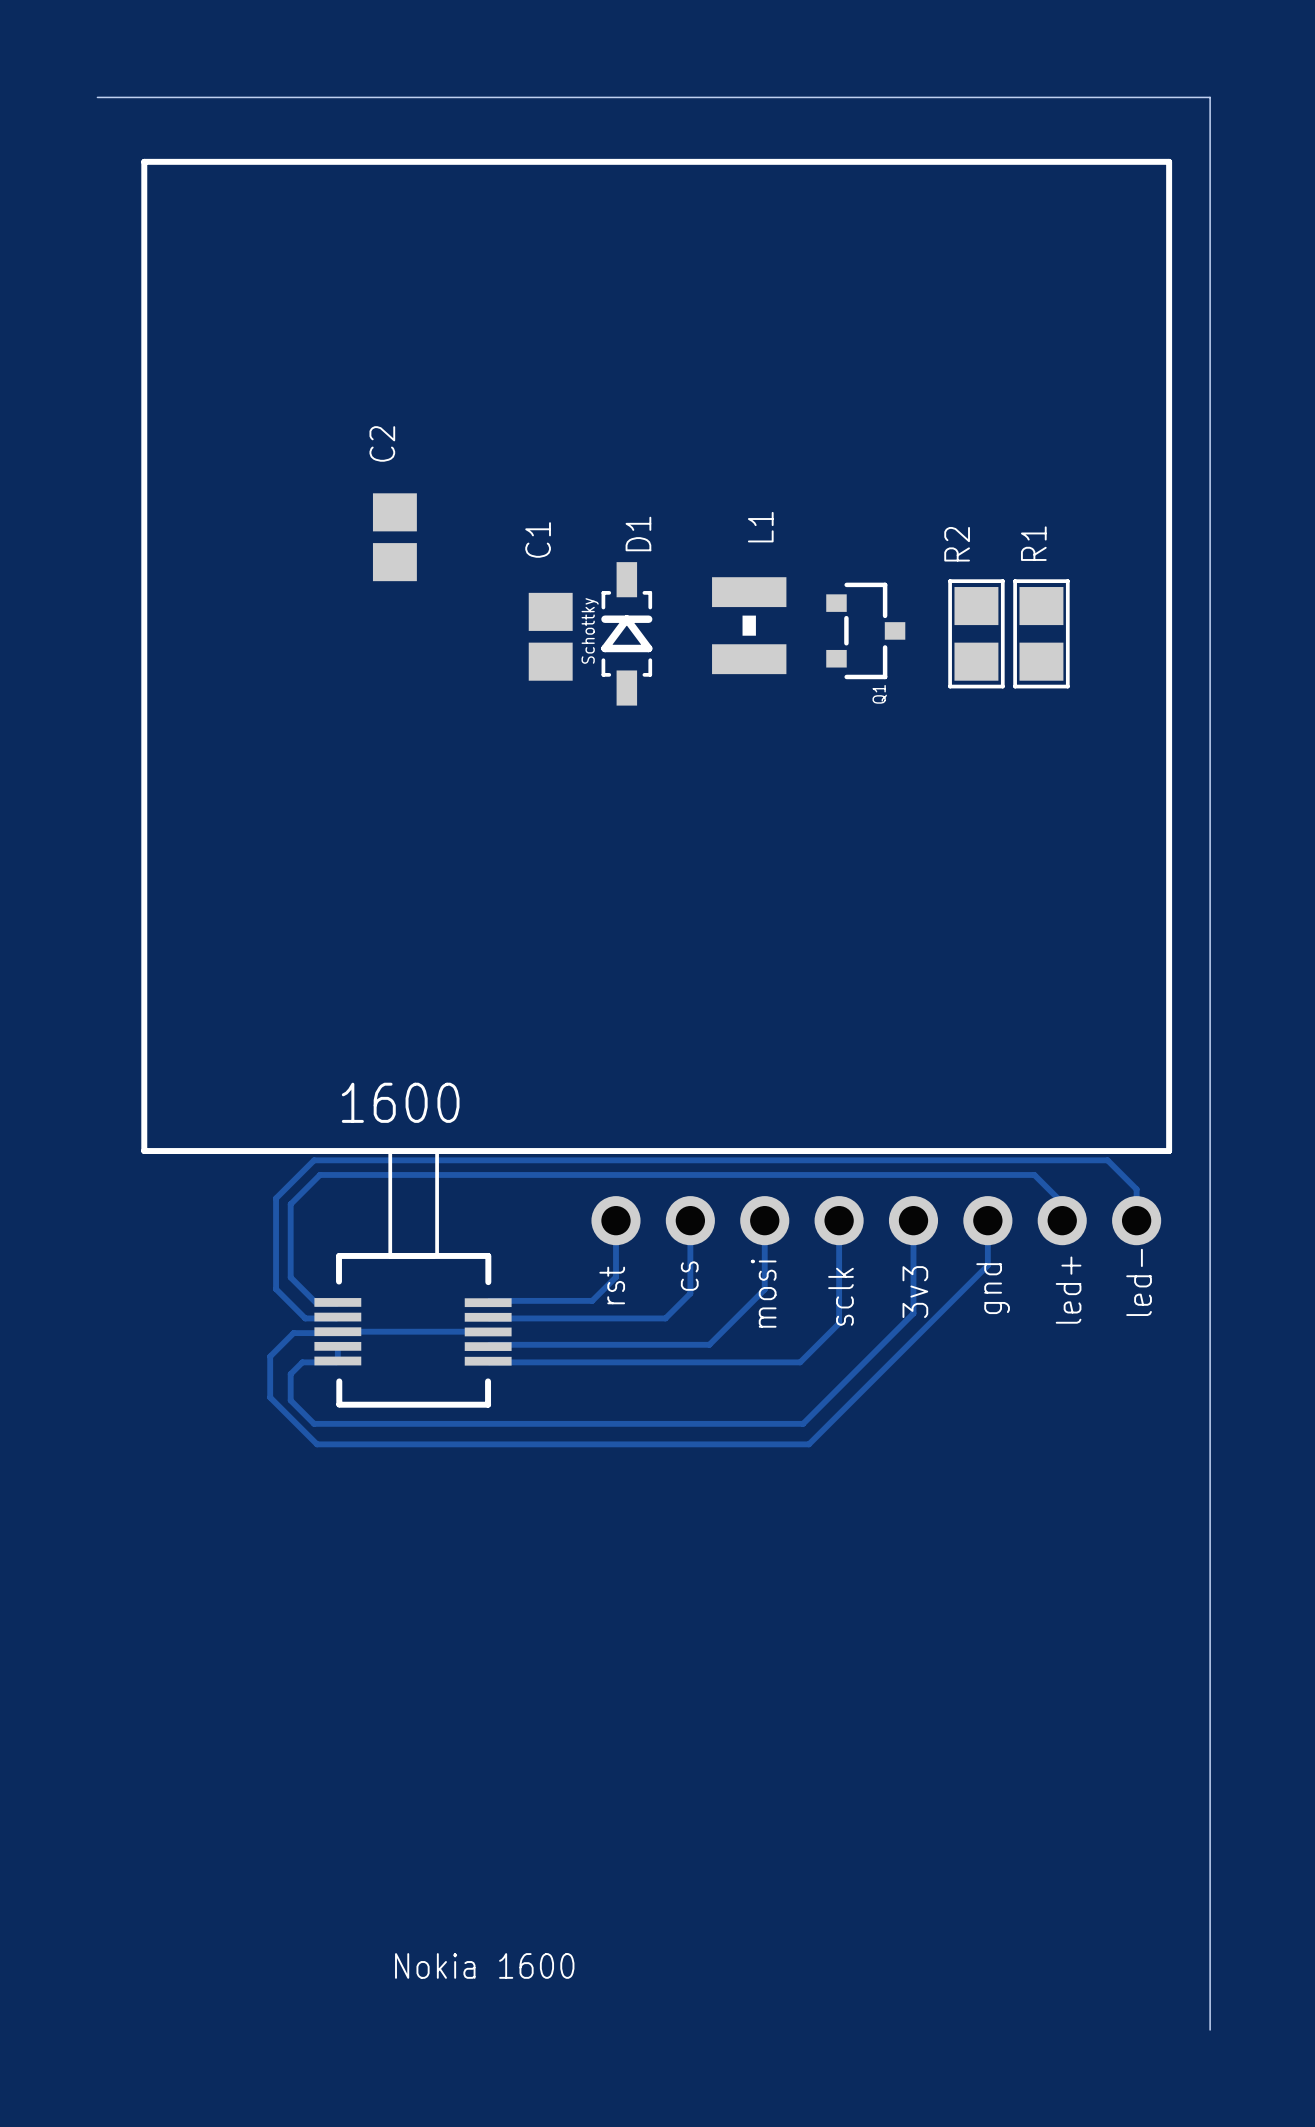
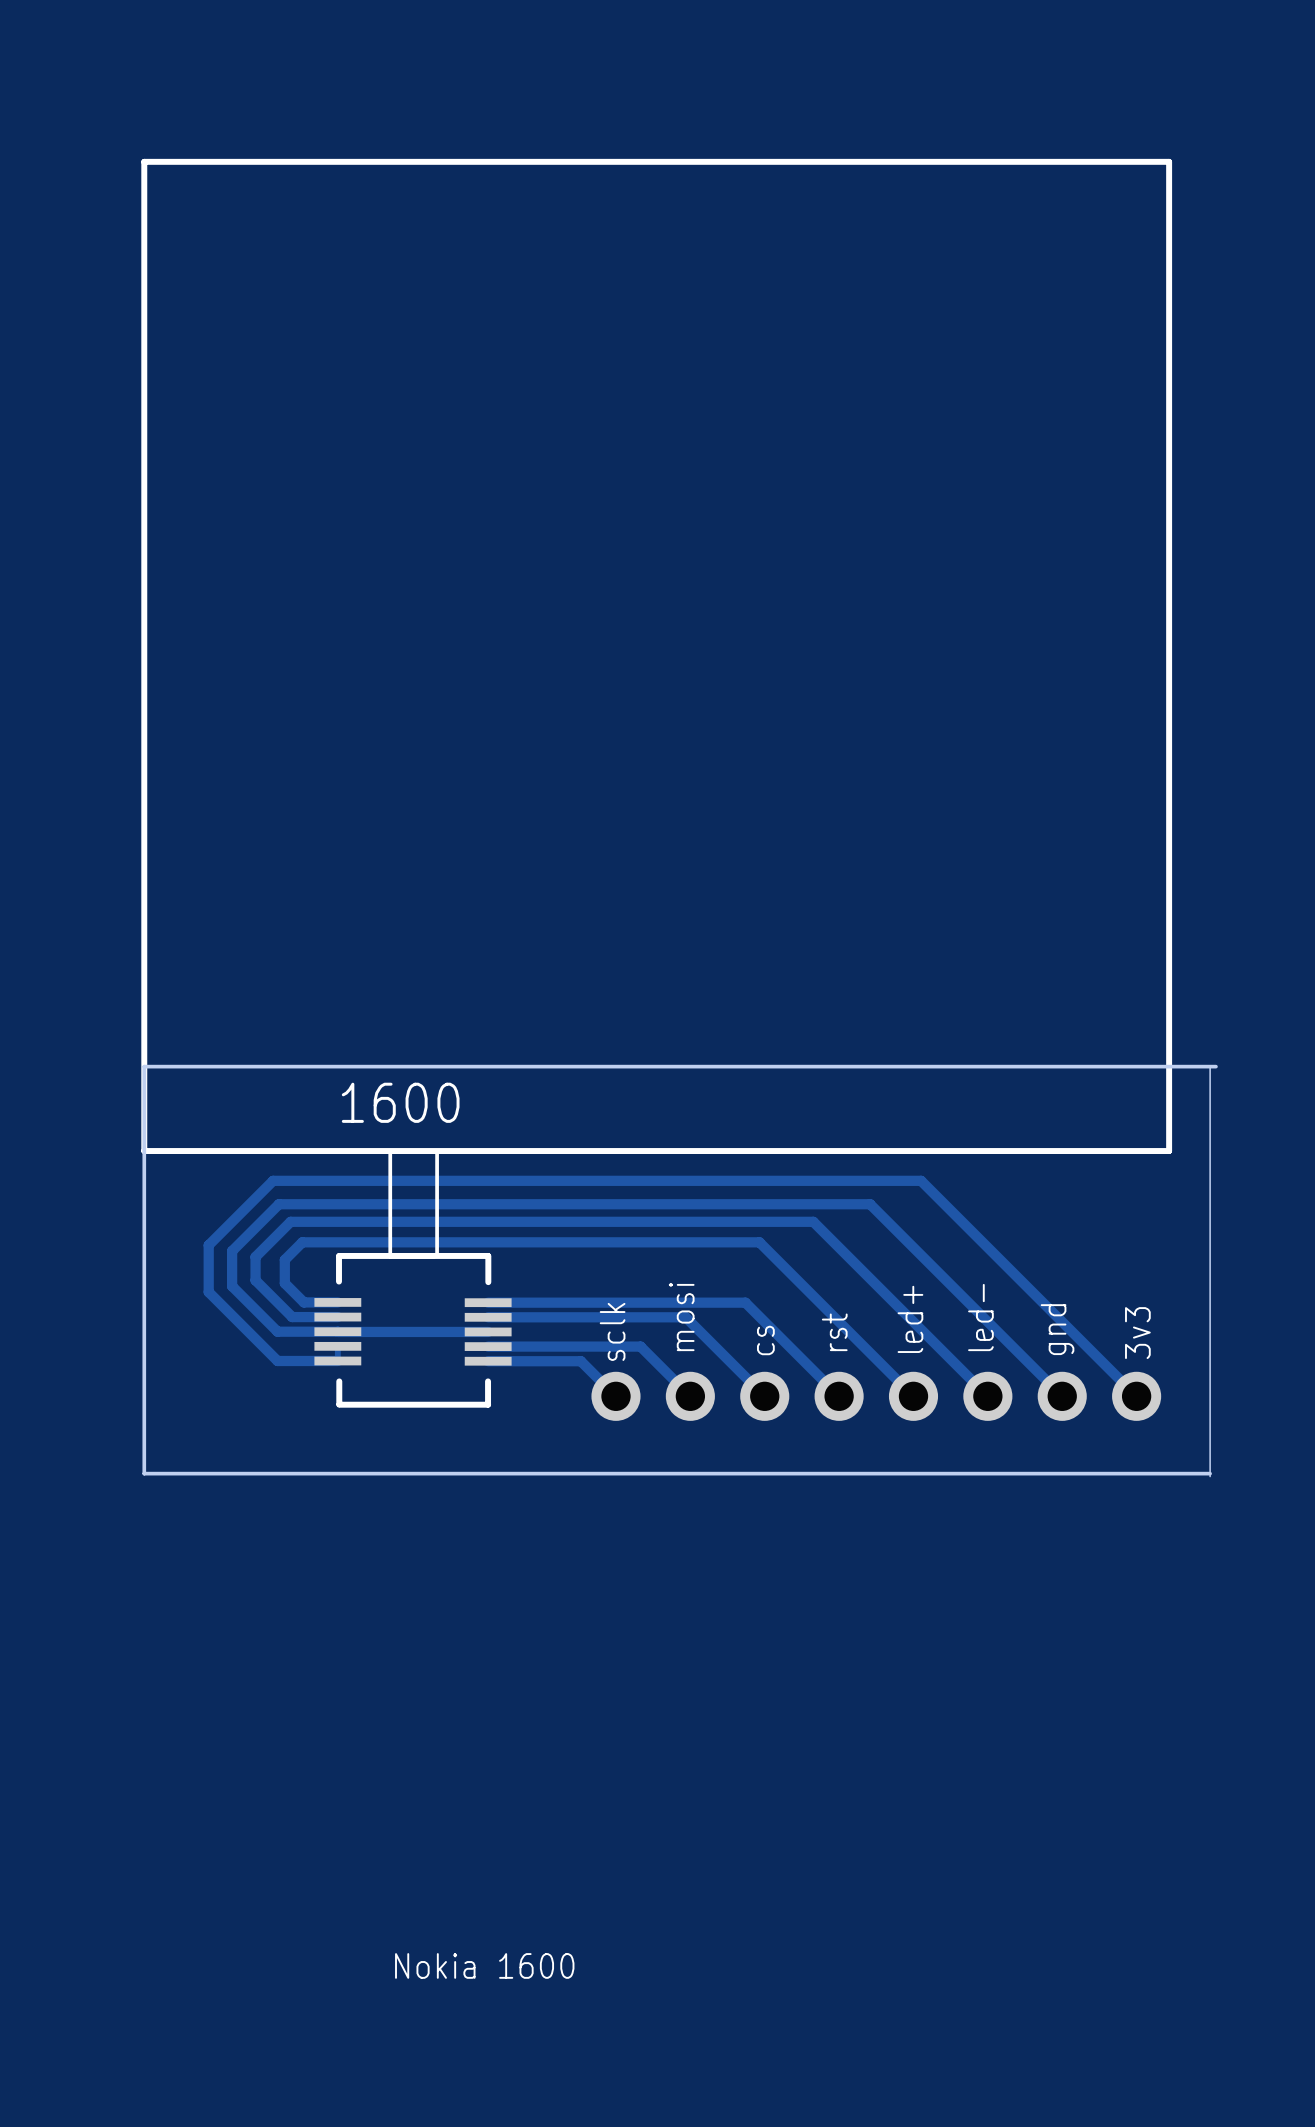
board edge: (97, 97) (1210, 97) (1210, 1066) -> none
C2: (394, 537) -> none
L1: (749, 625) -> none
Q1: (865, 630) -> none
D1: Schottky (626, 633) -> none
R2: (976, 633) -> none
R1: (1041, 633) -> none
C1: (550, 636) -> none
board edge: none -> (1215, 1066) (144, 1066) (144, 1473) (1210, 1473)
track: (615, 1220) (615, 1277) (592, 1300) (489, 1300) (488, 1302) -> (839, 1396) (745, 1302) (488, 1302)
track: (690, 1220) (690, 1293) (665, 1318) (488, 1317) -> (764, 1396) (685, 1317) (488, 1317)
track: (764, 1220) (764, 1289) (709, 1344) (489, 1344) (488, 1346) -> (690, 1396) (640, 1346) (488, 1346)
track: (839, 1220) (839, 1323) (800, 1362) (488, 1361) -> (615, 1396) (580, 1361) (488, 1361)
part position: (876, 1220) -> (876, 1396)
track: (913, 1220) (913, 1313) (803, 1423) (314, 1423) (290, 1400) (290, 1374) (302, 1362) (337, 1360) -> (1136, 1396) (921, 1180) (273, 1180) (208, 1245) (208, 1292) (277, 1360) (337, 1360)
track: (987, 1220) (987, 1265) (808, 1444) (317, 1444) (270, 1397) (270, 1356) (293, 1333) (487, 1331) -> (338, 1331) (488, 1331)
track: (1062, 1220) (1062, 1202) (1034, 1174) (319, 1174) (290, 1204) (290, 1277) (317, 1303) (337, 1302) -> (913, 1396) (759, 1242) (302, 1242) (284, 1259) (284, 1283) (303, 1302) (337, 1302)
track: (1136, 1220) (1136, 1189) (1107, 1160) (314, 1160) (276, 1198) (276, 1289) (305, 1318) (337, 1317) -> (987, 1396) (813, 1221) (290, 1221) (255, 1256) (255, 1280) (292, 1317) (337, 1317)
text position: cs (689, 1276) -> cs (765, 1340)
text position: led- (1139, 1282) -> led- (980, 1317)
text position: rst (612, 1285) -> rst (834, 1332)
text position: gnd (993, 1288) -> gnd (1057, 1329)
text position: led+ (1068, 1290) -> led+ (910, 1319)
text position: 3v3 (915, 1292) -> 3v3 (1137, 1333)
text position: mosi (763, 1293) -> mosi (681, 1317)
text position: sclk (840, 1296) -> sclk (612, 1331)
track: none -> (337, 1331) (277, 1331) (232, 1286) (232, 1251) (278, 1204) (870, 1204) (1062, 1396)
board edge: (1210, 1476) (1210, 2029) -> none

